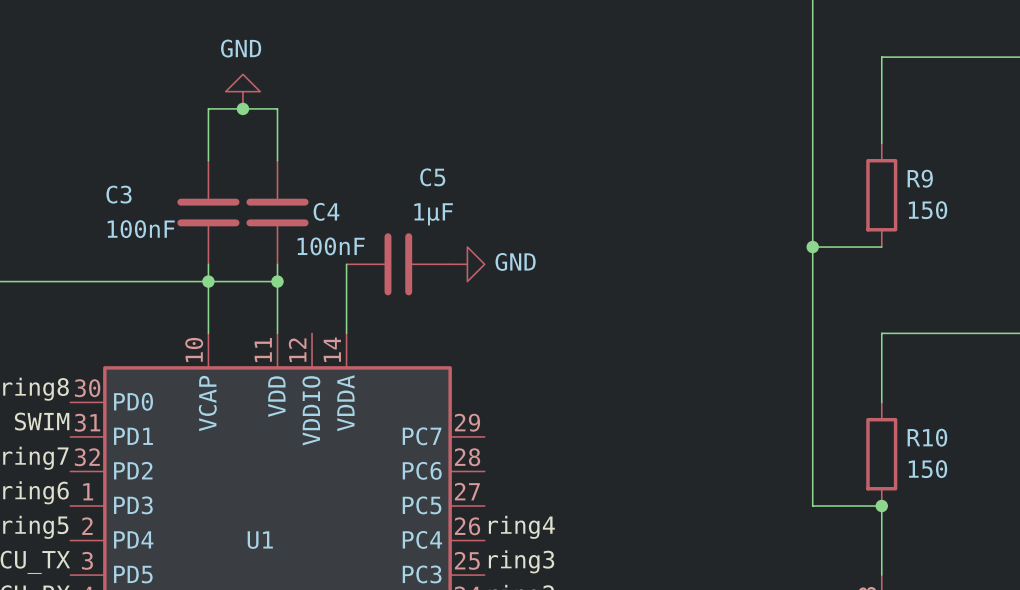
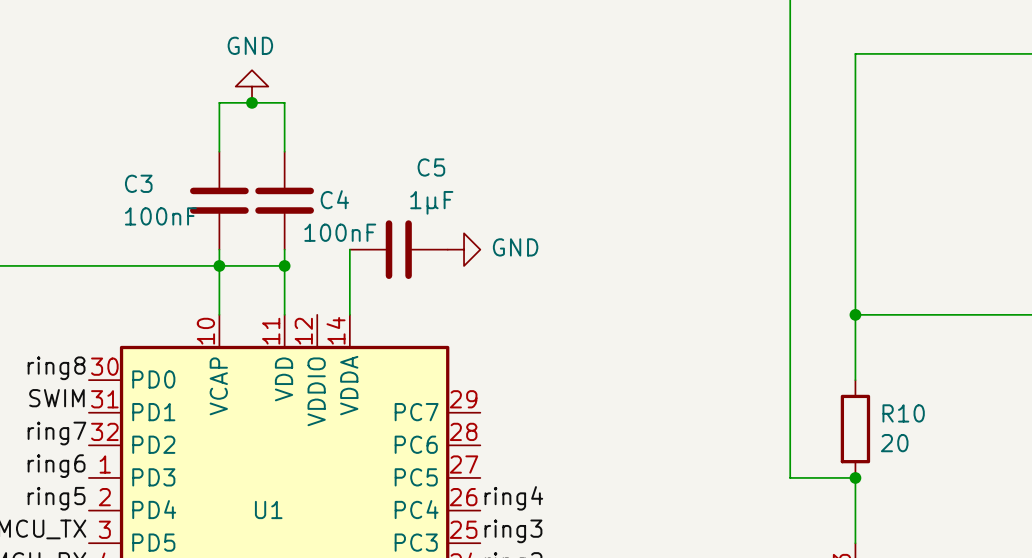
wire: none -> (855, 135) (855, 314)
R9: 150 (881, 195) -> none
wire: (812, 247) (881, 247) -> none
junction: (812, 247) -> none
junction: none -> (855, 314)
R10 value: 150 (927, 469) -> 20 (894, 443)

